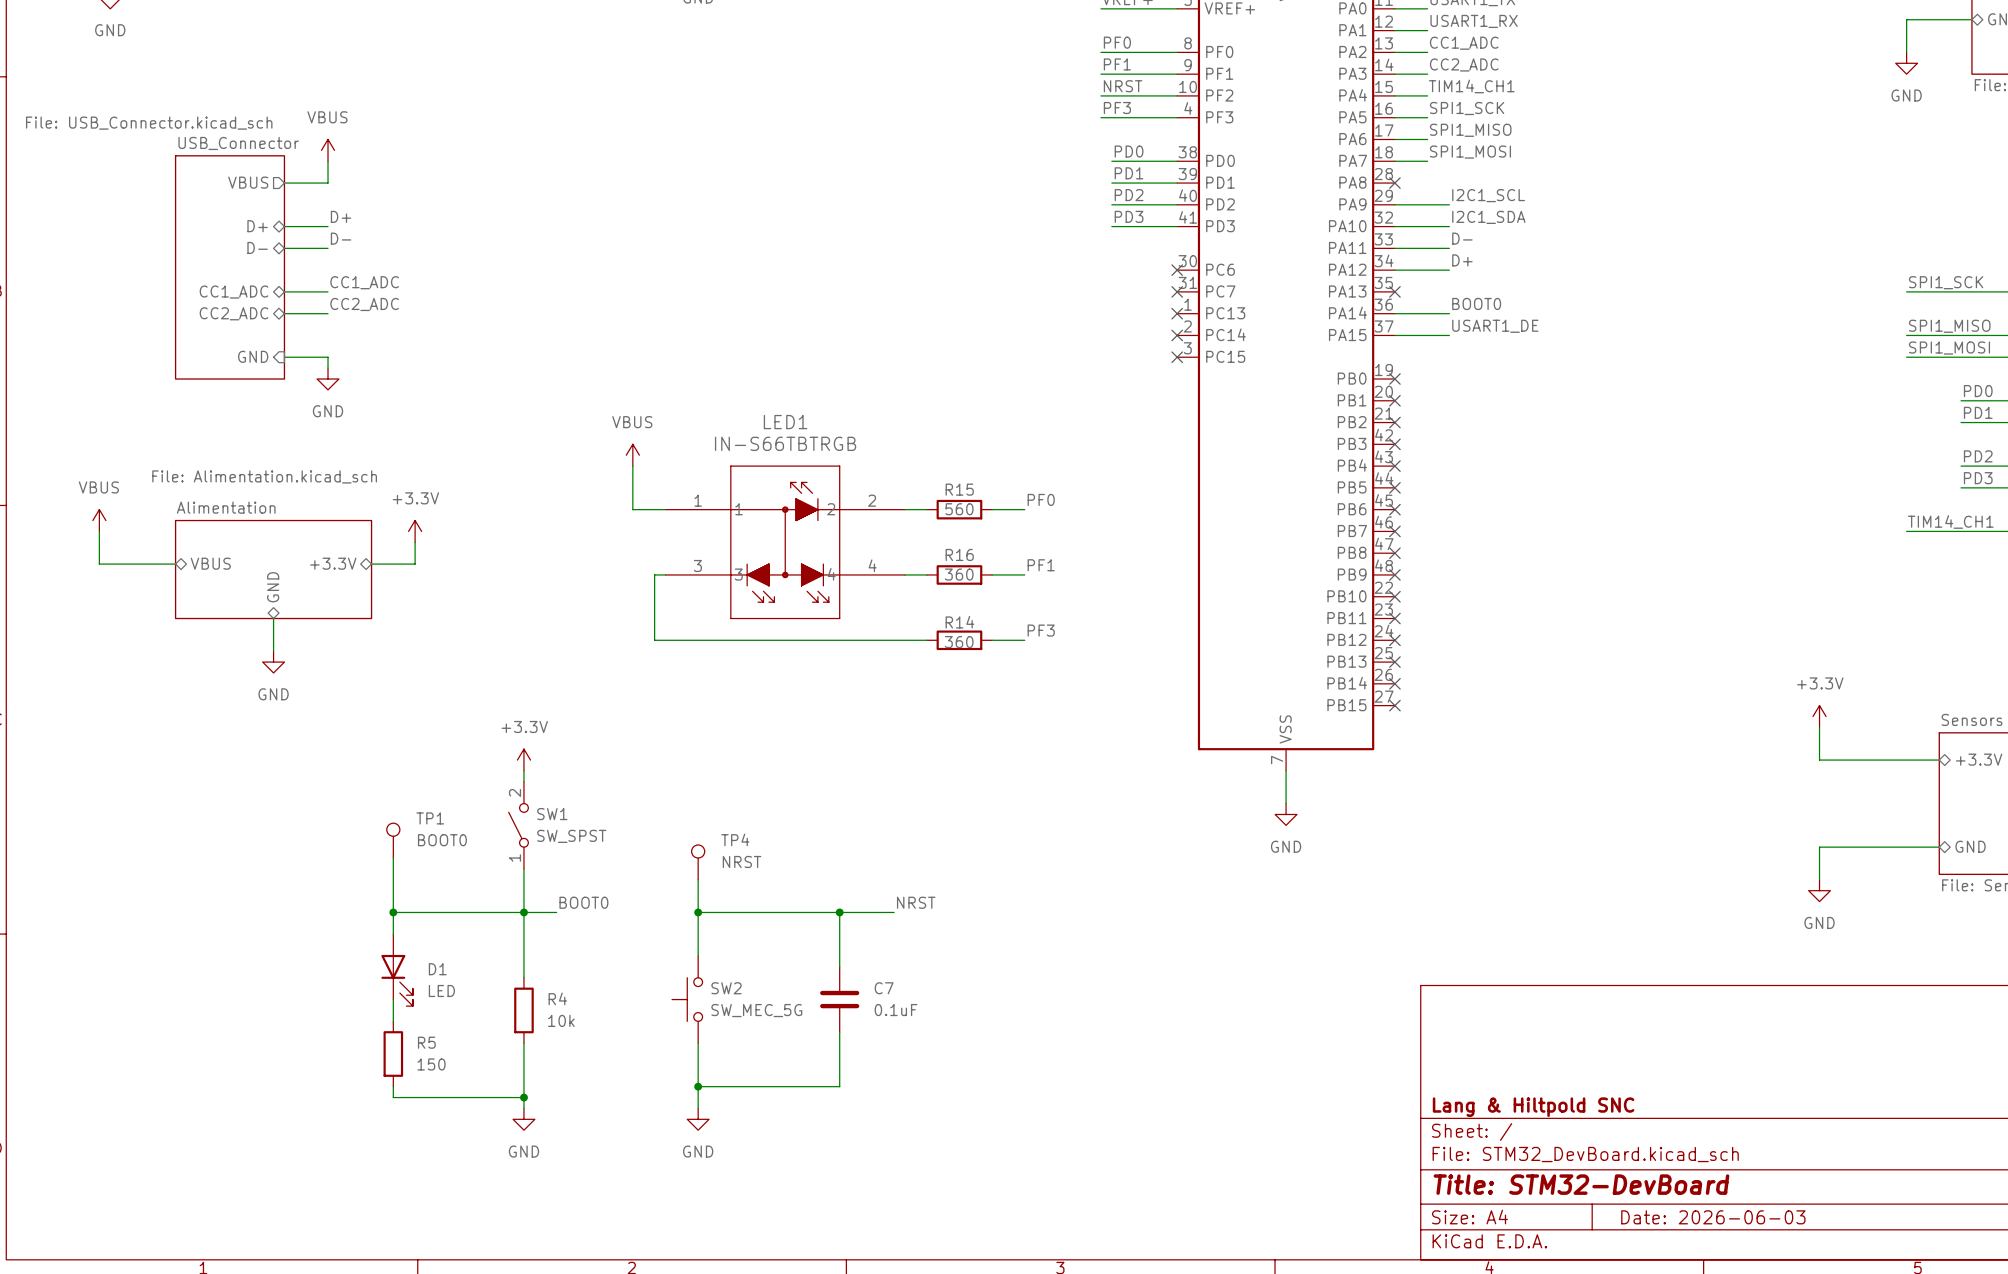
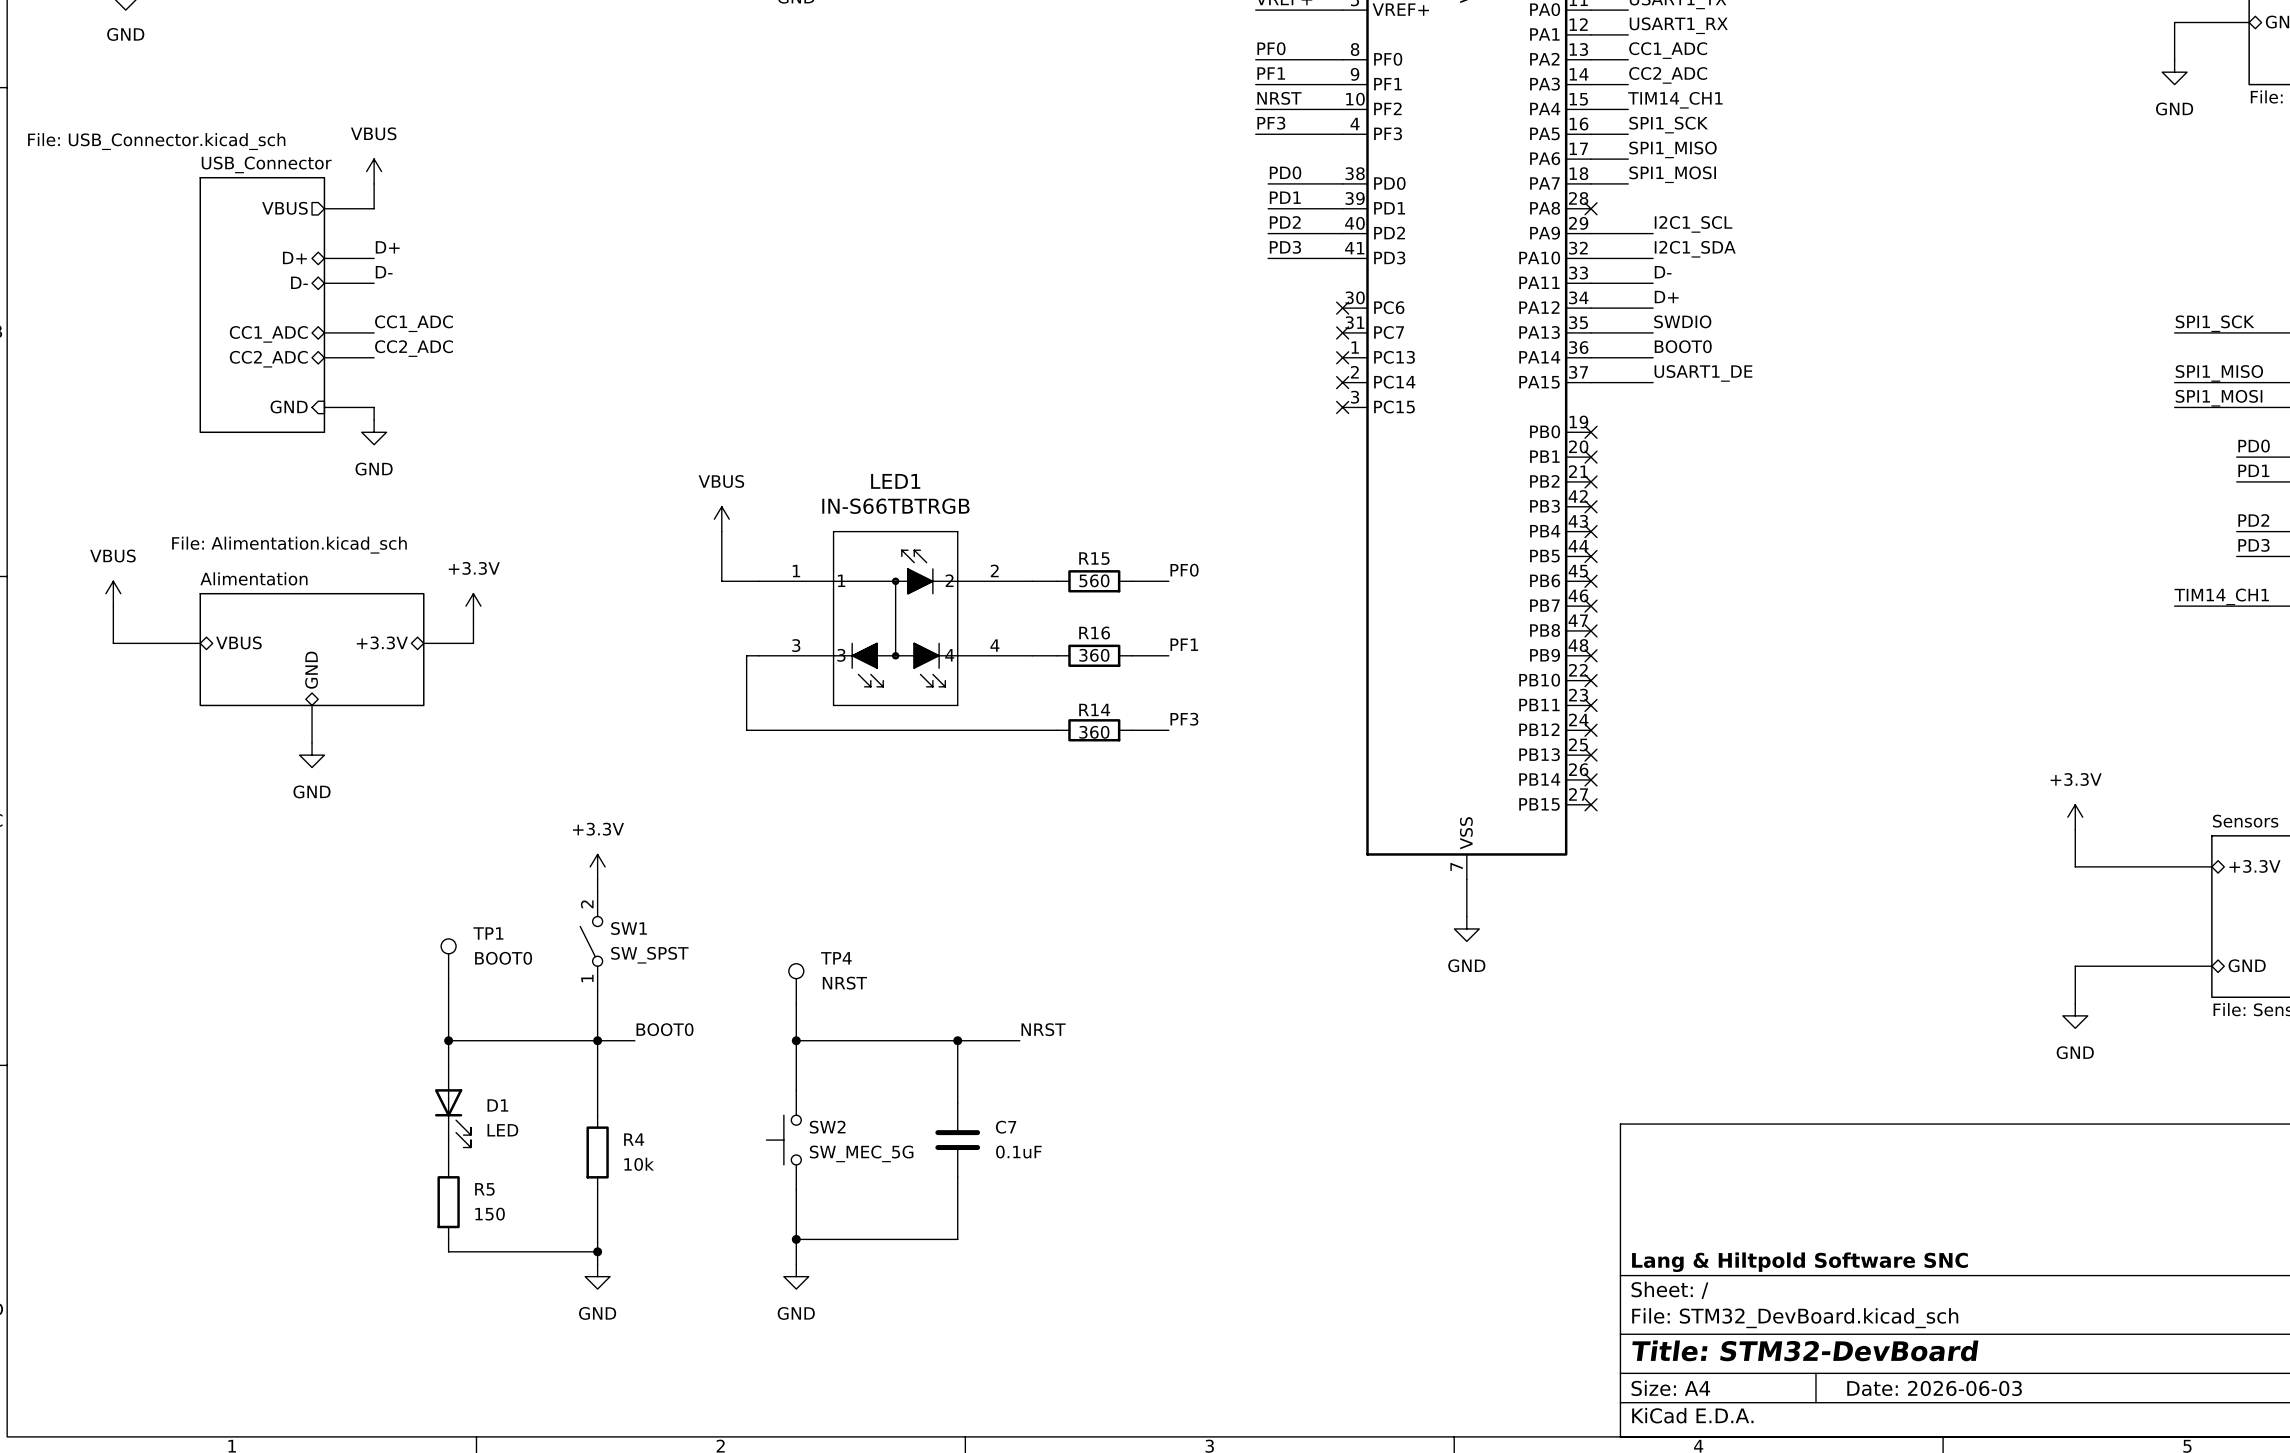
label: none -> SWDIO (1682, 321)
wire: none -> (1591, 332) (1653, 332)
no-connect mark: (1394, 291) -> none
title block: Lang & Hiltpold SNC (1533, 1107) -> Lang & Hiltpold Software SNC (1799, 1262)

